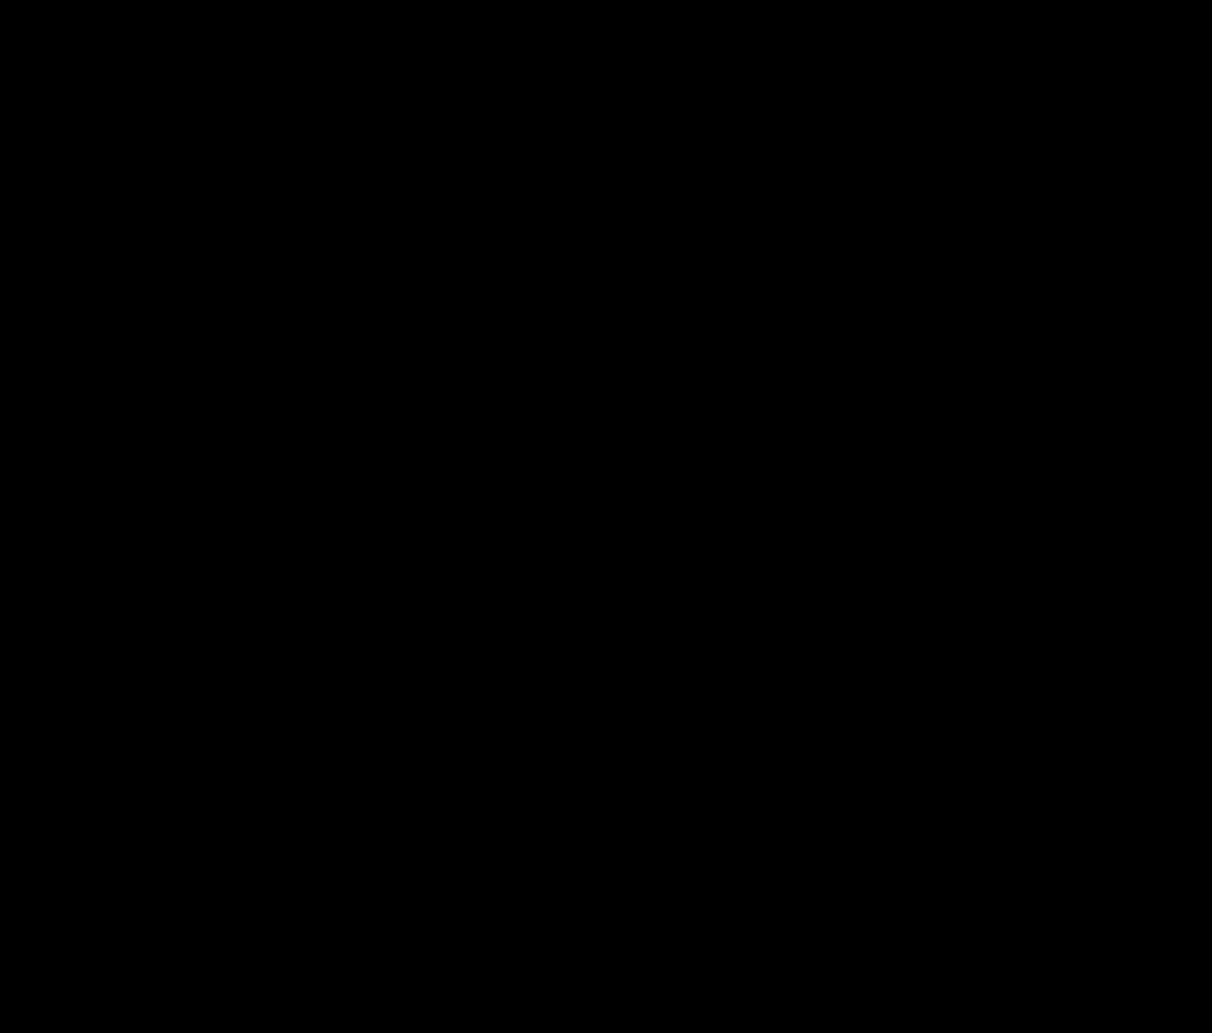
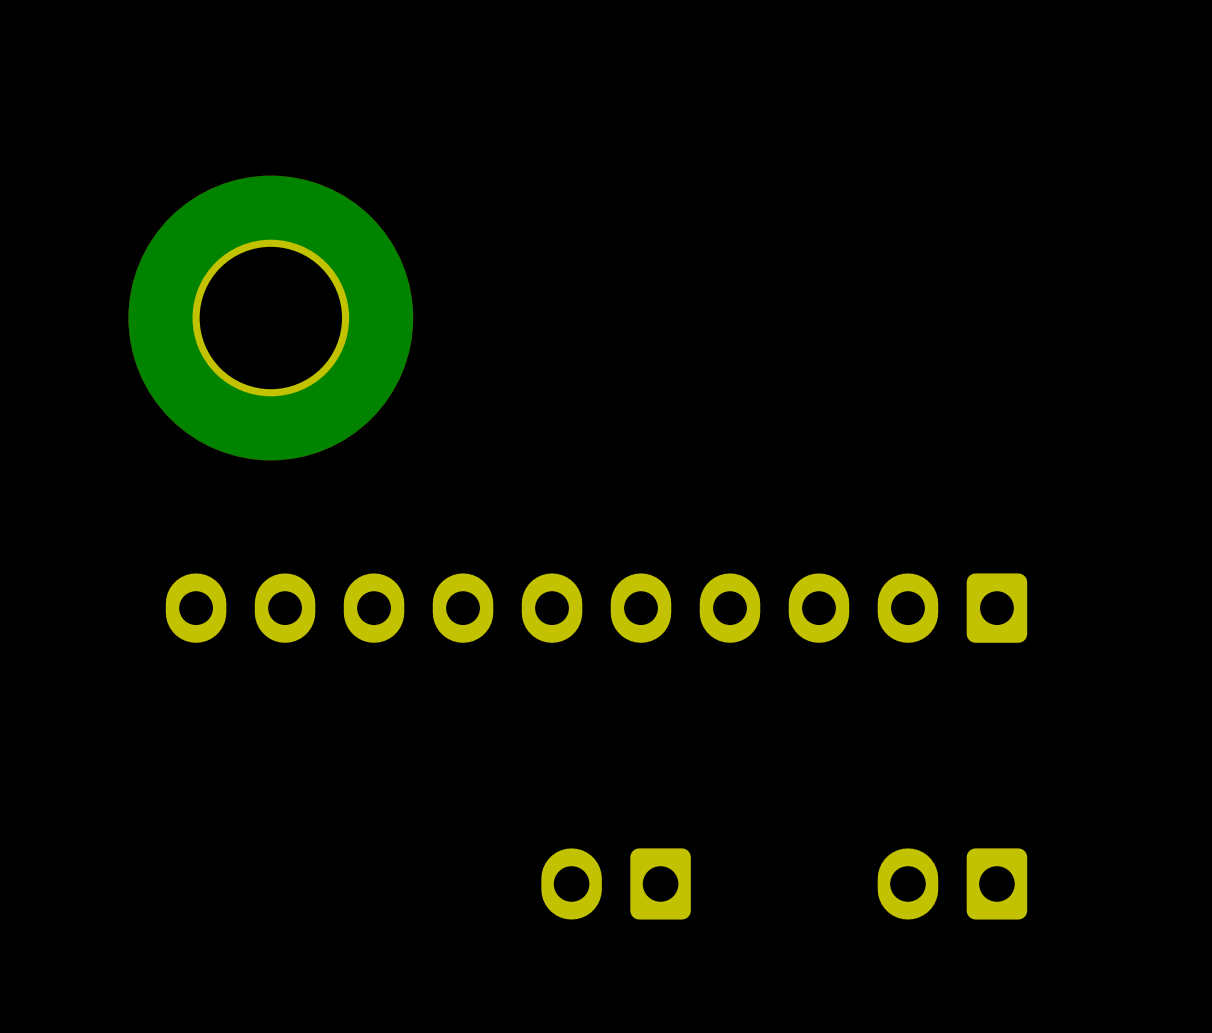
part: none -> (270, 318)
part: none -> (596, 608)
part: none -> (616, 883)
part: none -> (952, 883)

